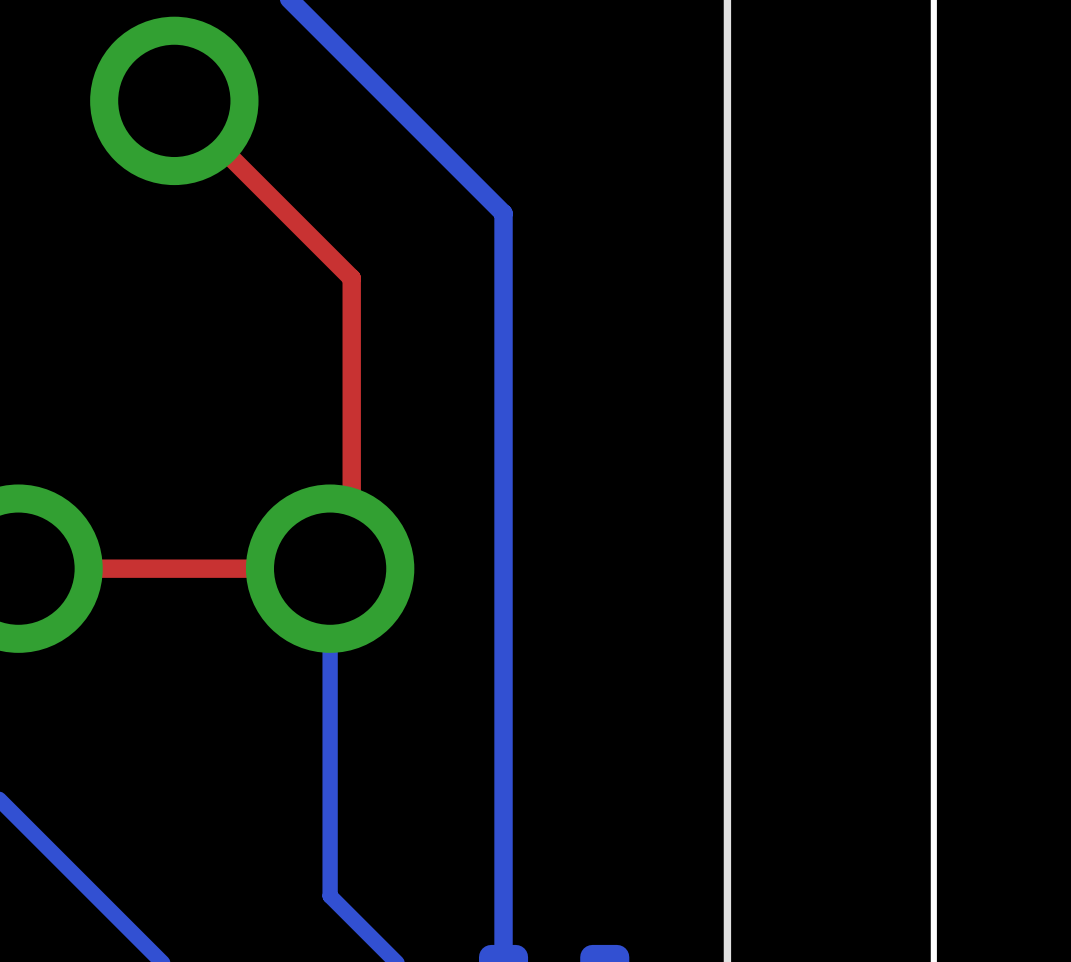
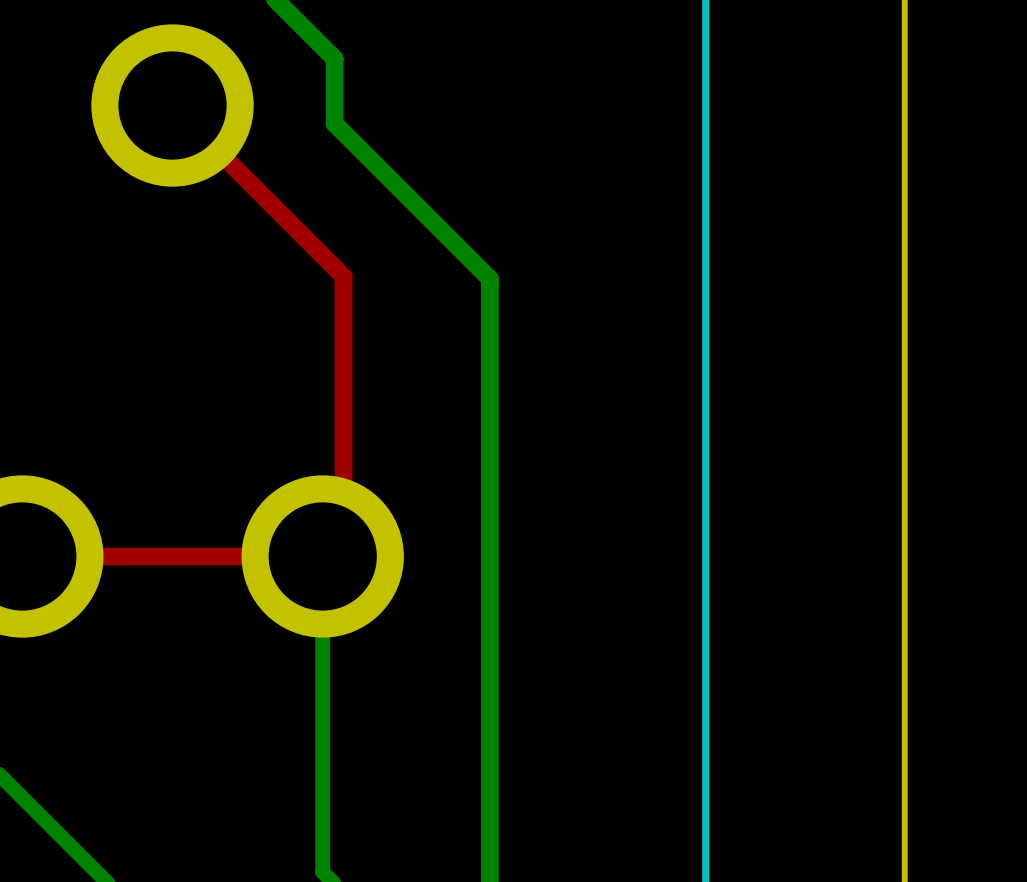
bottom track: (342, 52) (503, 213) (503, 280) -> (334, 58) (334, 123) (489, 278)

